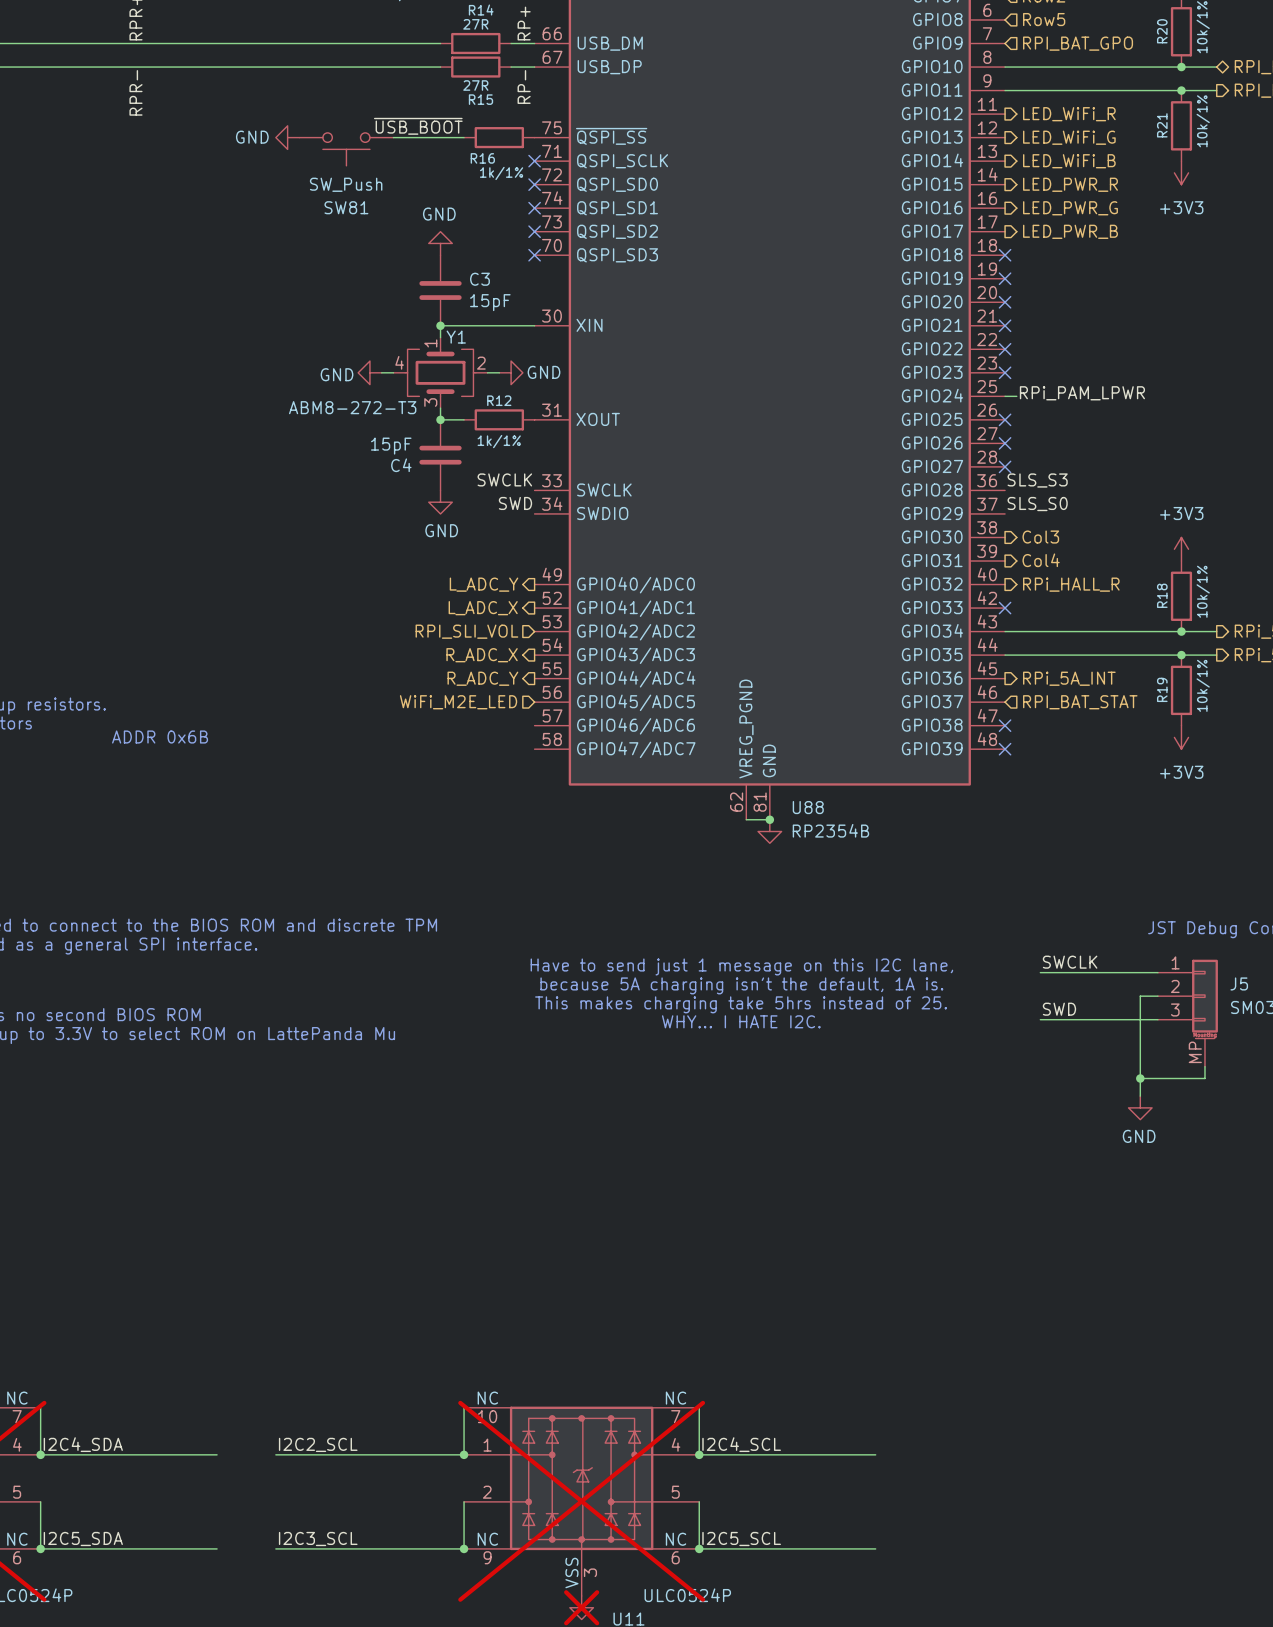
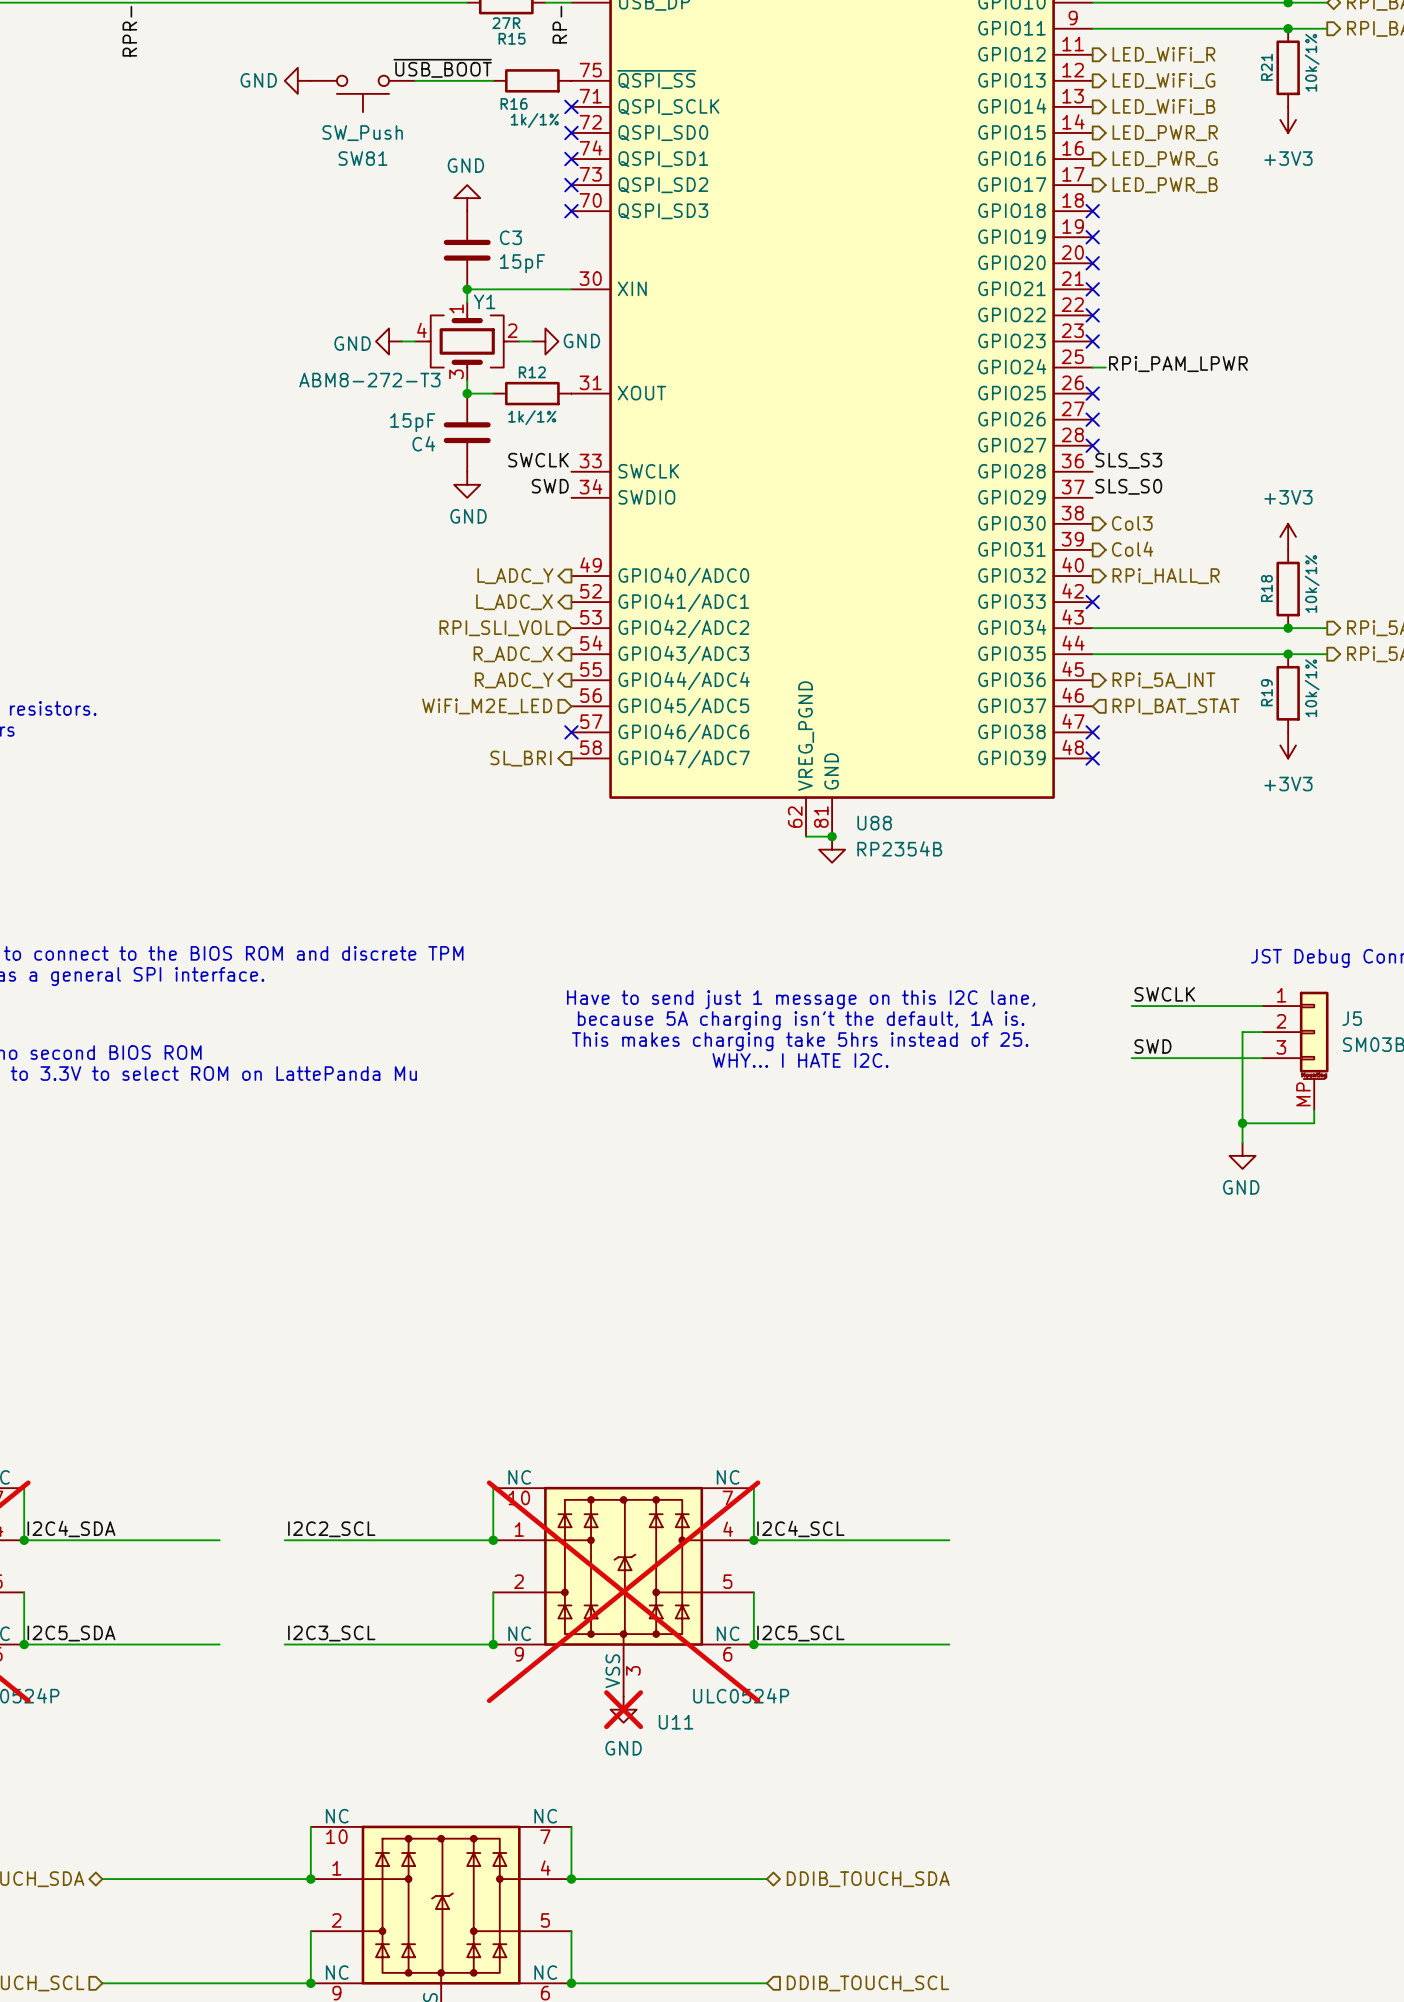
no-connect mark: none -> (571, 732)
text: ADDR 0x6B (160, 737) -> none
hierarchical label: none -> SL_BRI (521, 758)

